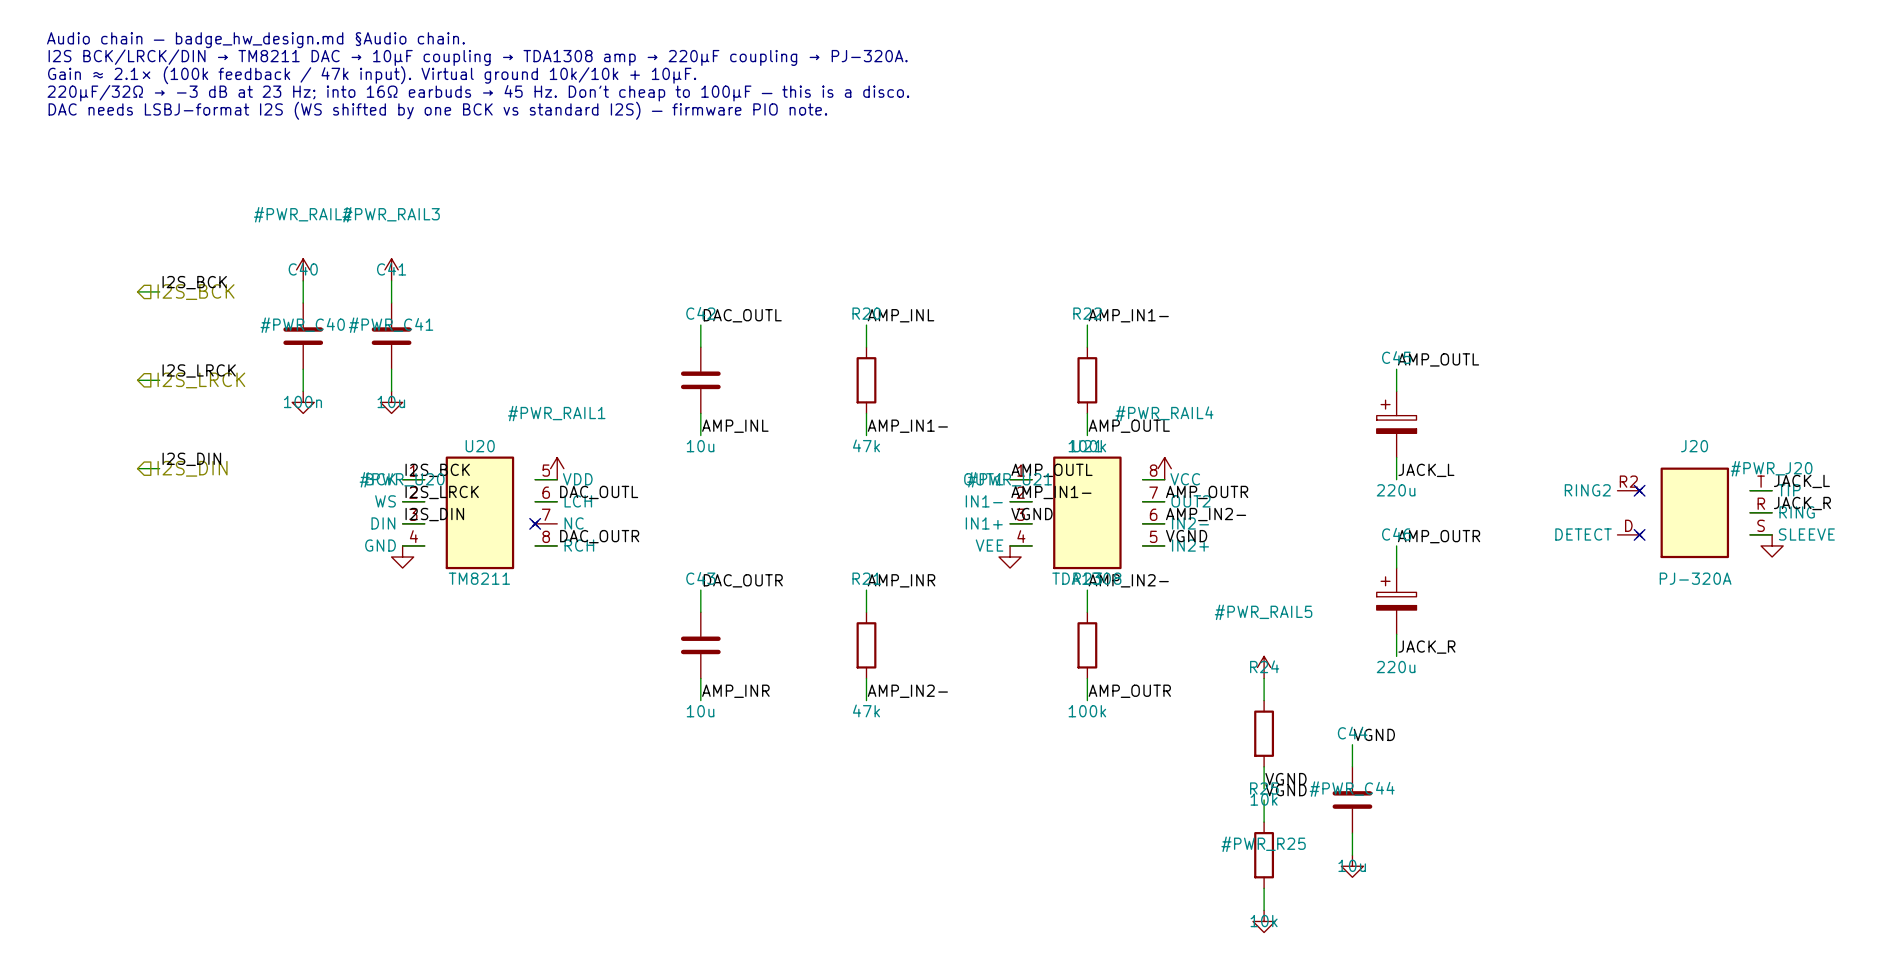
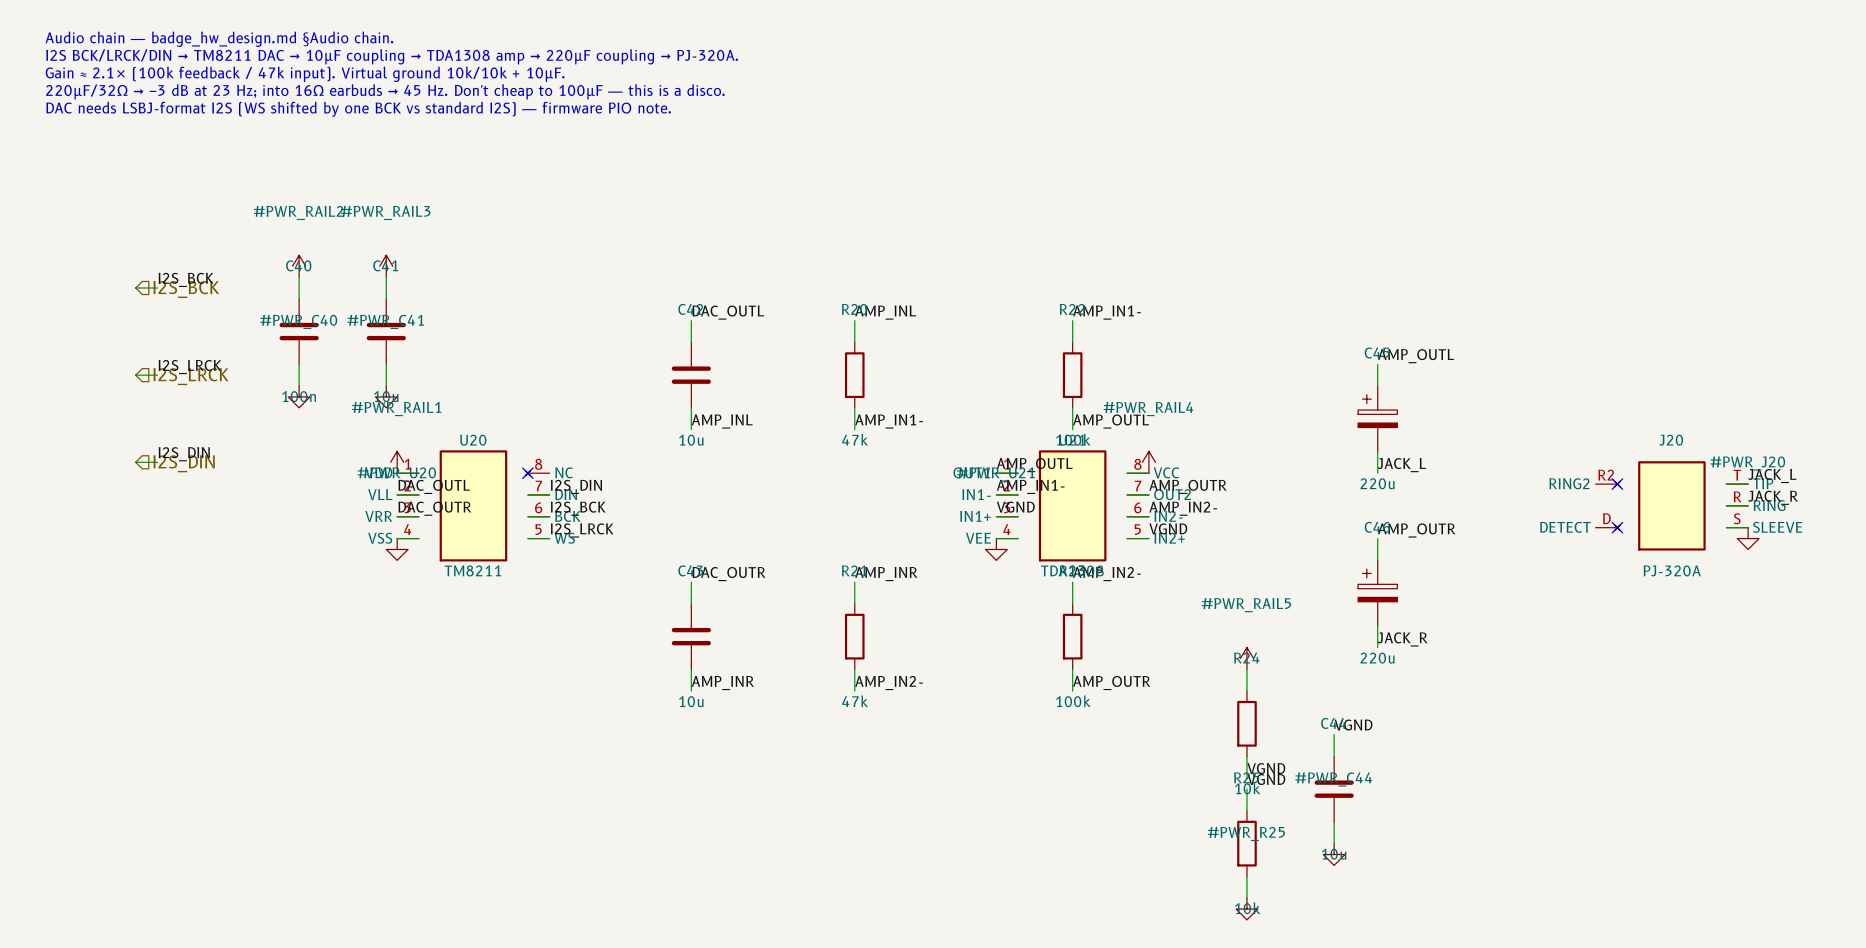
U20 symbol: [402, 456, 558, 570] -> [397, 450, 550, 562]
#PWR_RAIL1 position: (557, 468) -> (397, 462)
label position: I2S_BCK (437, 470) -> I2S_BCK (578, 508)
label: I2S_LRCK (442, 492) -> DAC_OUTL (434, 486)
label: DAC_OUTL (599, 492) -> I2S_DIN (576, 486)
label: I2S_DIN (434, 514) -> DAC_OUTR (434, 508)
no-connect mark position: (535, 523) -> (527, 473)
label: DAC_OUTR (599, 536) -> I2S_LRCK (582, 530)

